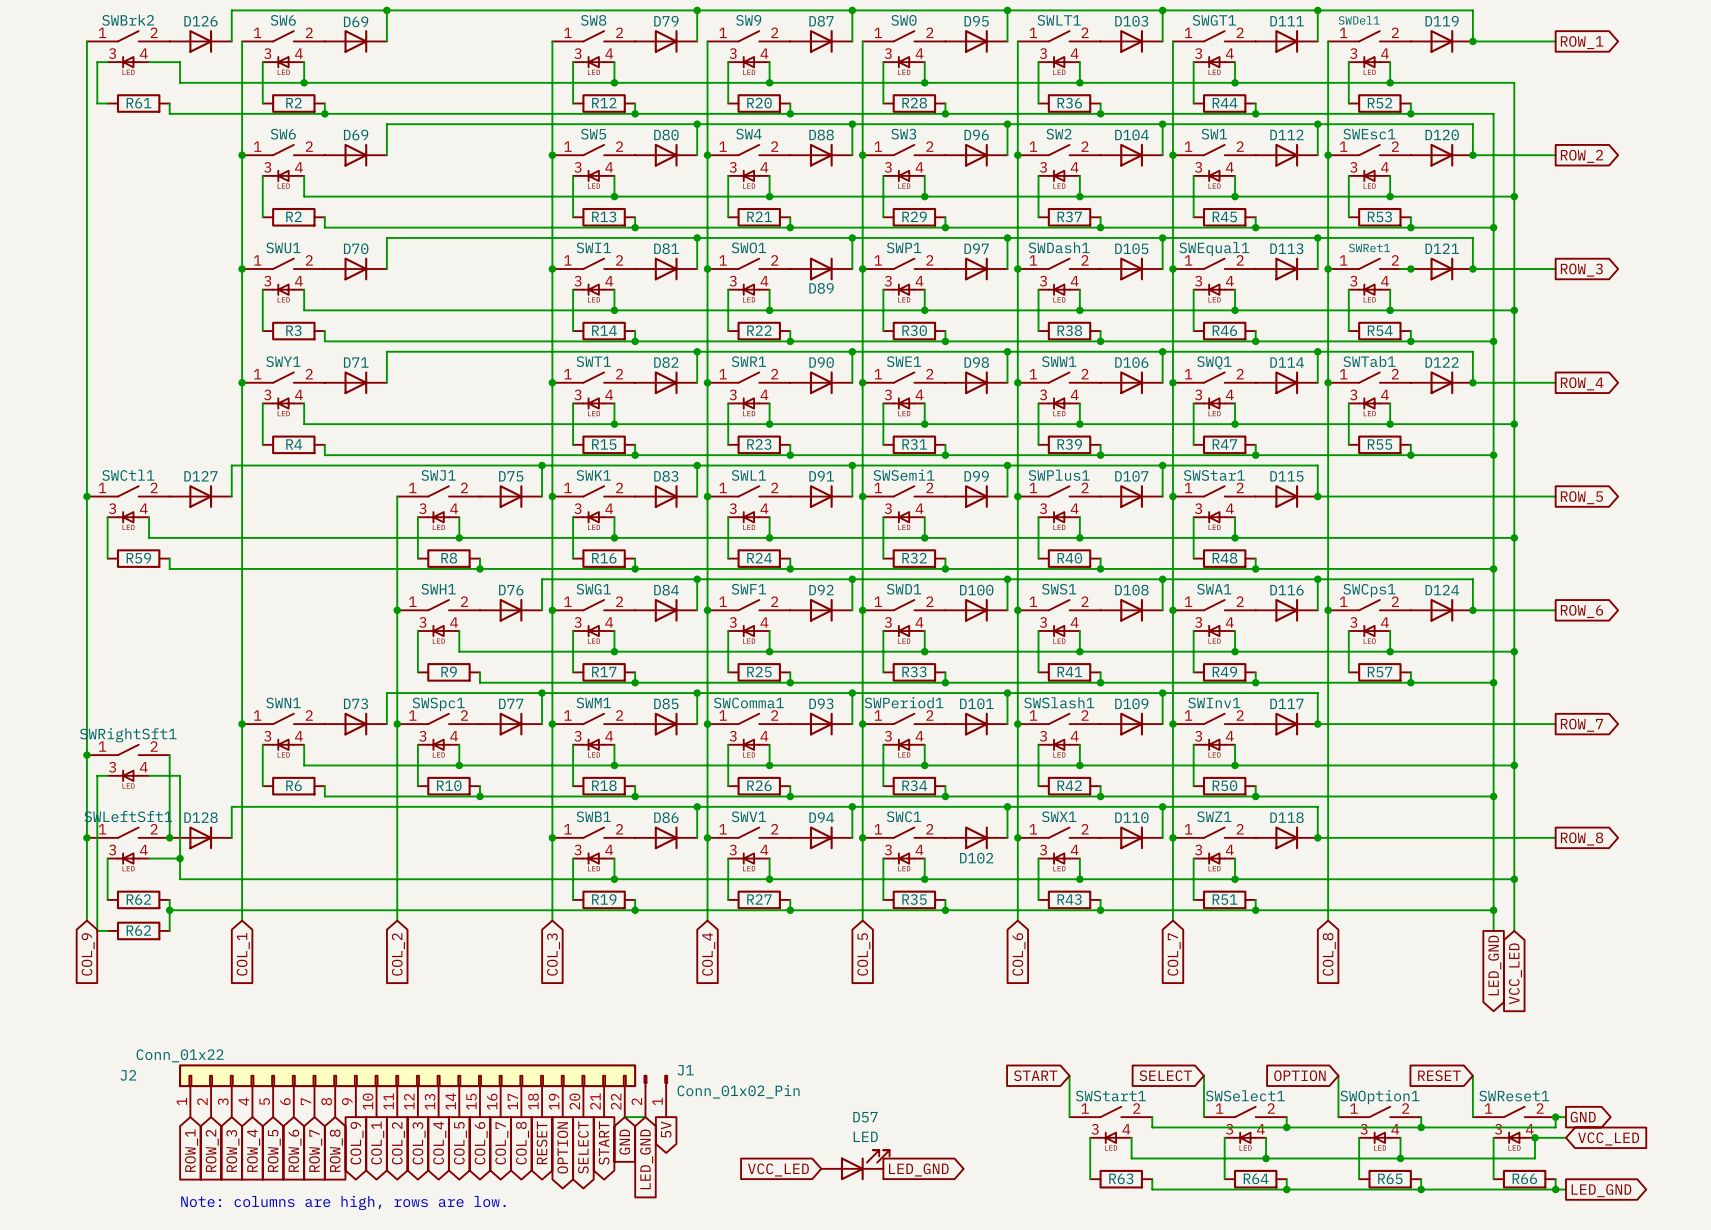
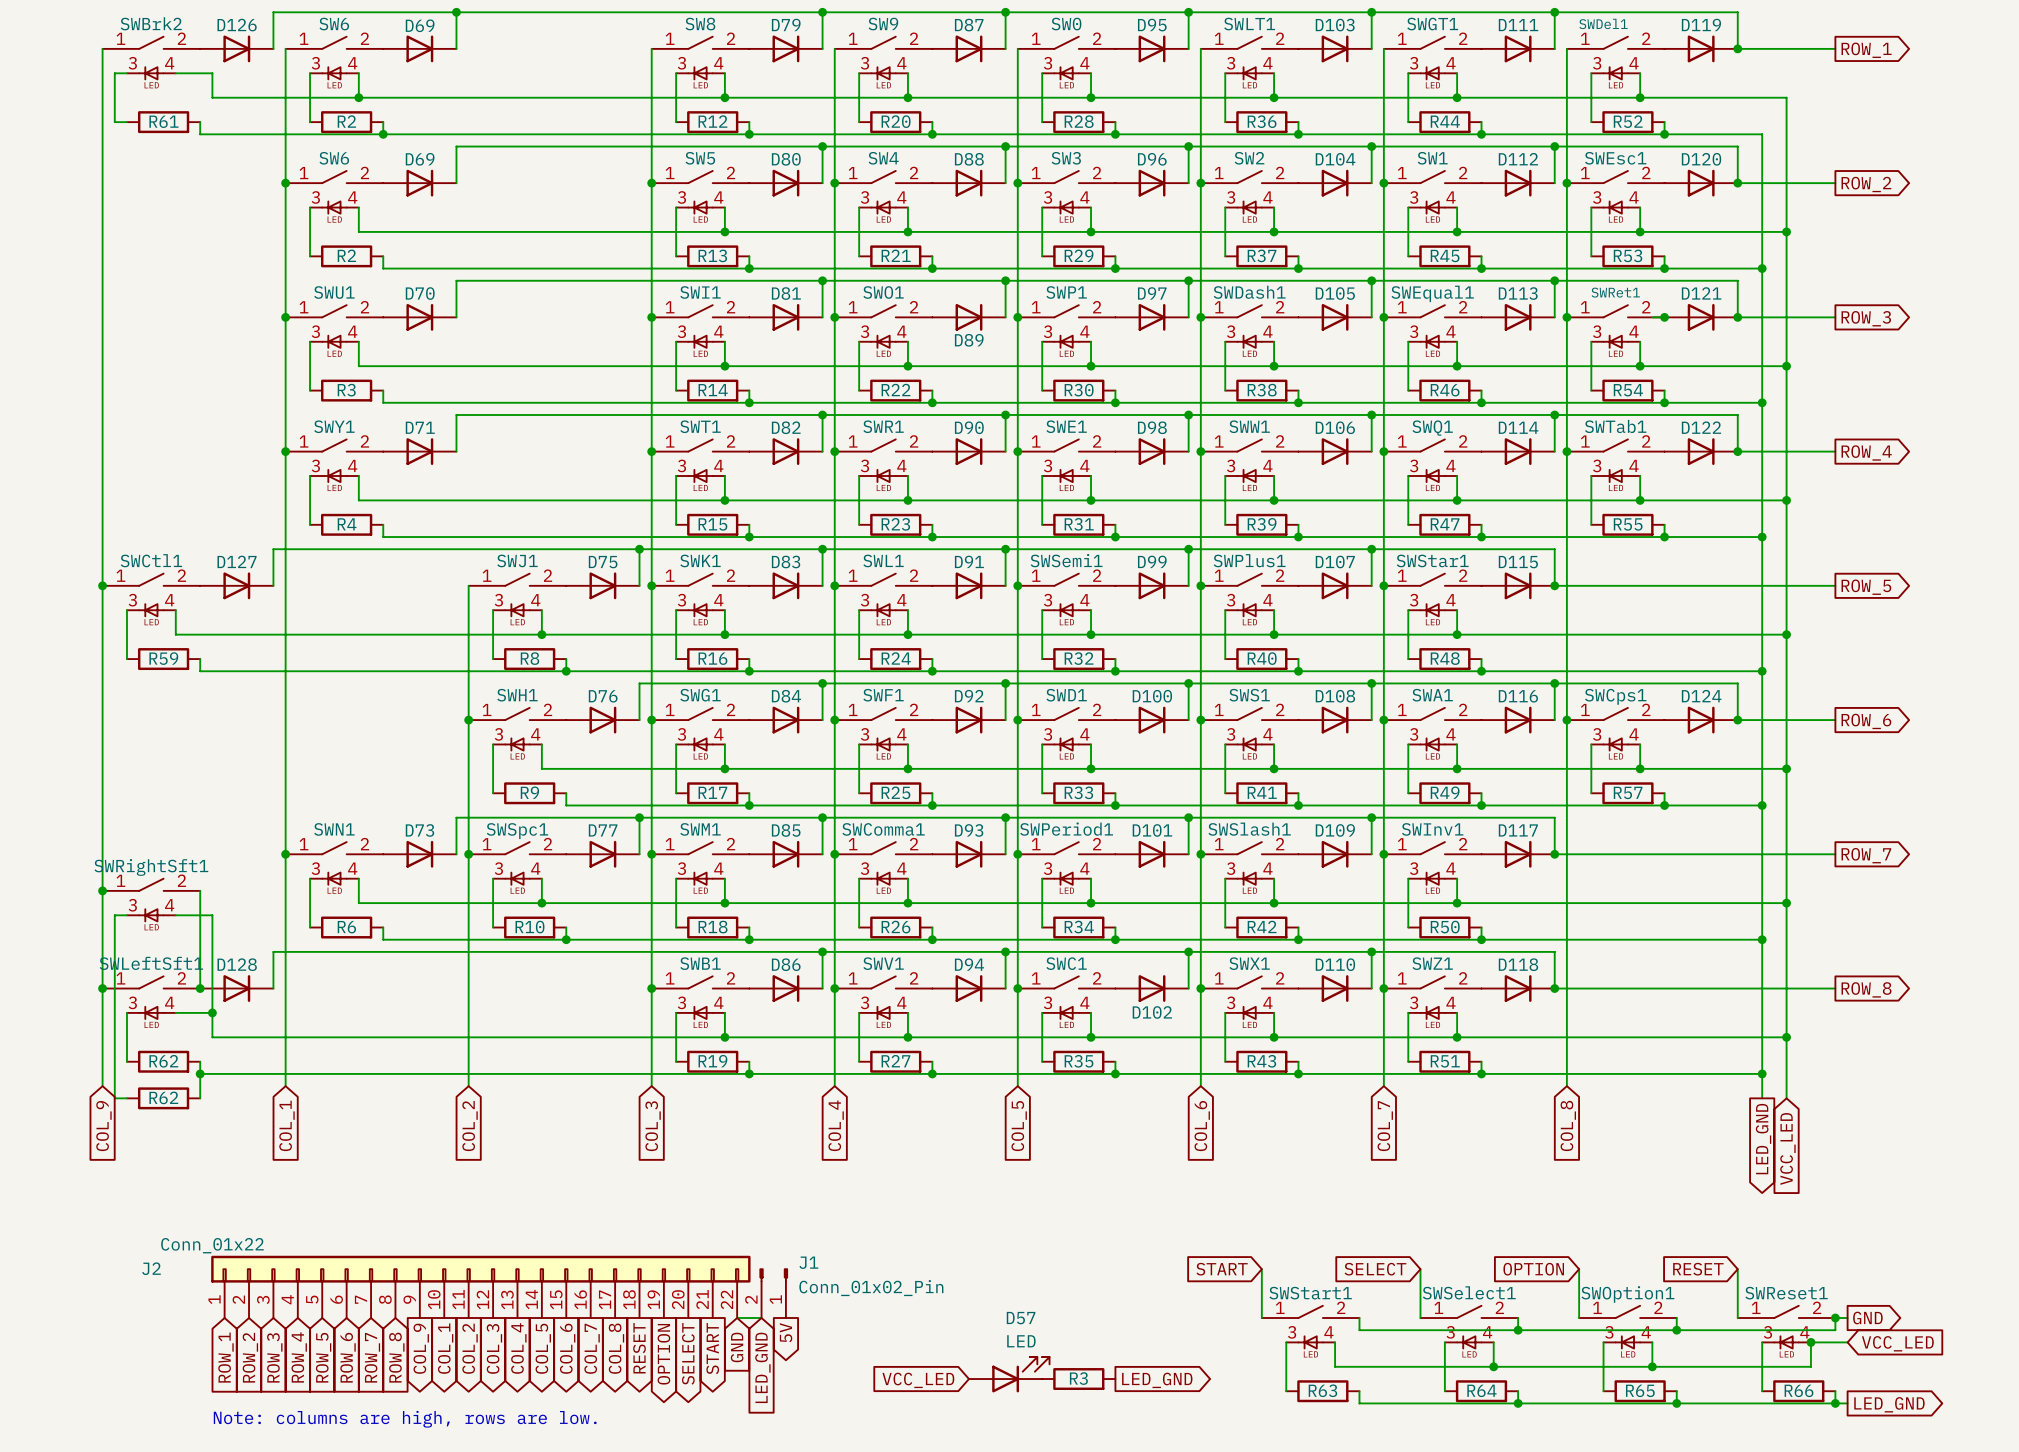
R3: none -> (1078, 1379)
global label position: LED_GND (918, 1170) -> LED_GND (1157, 1380)

